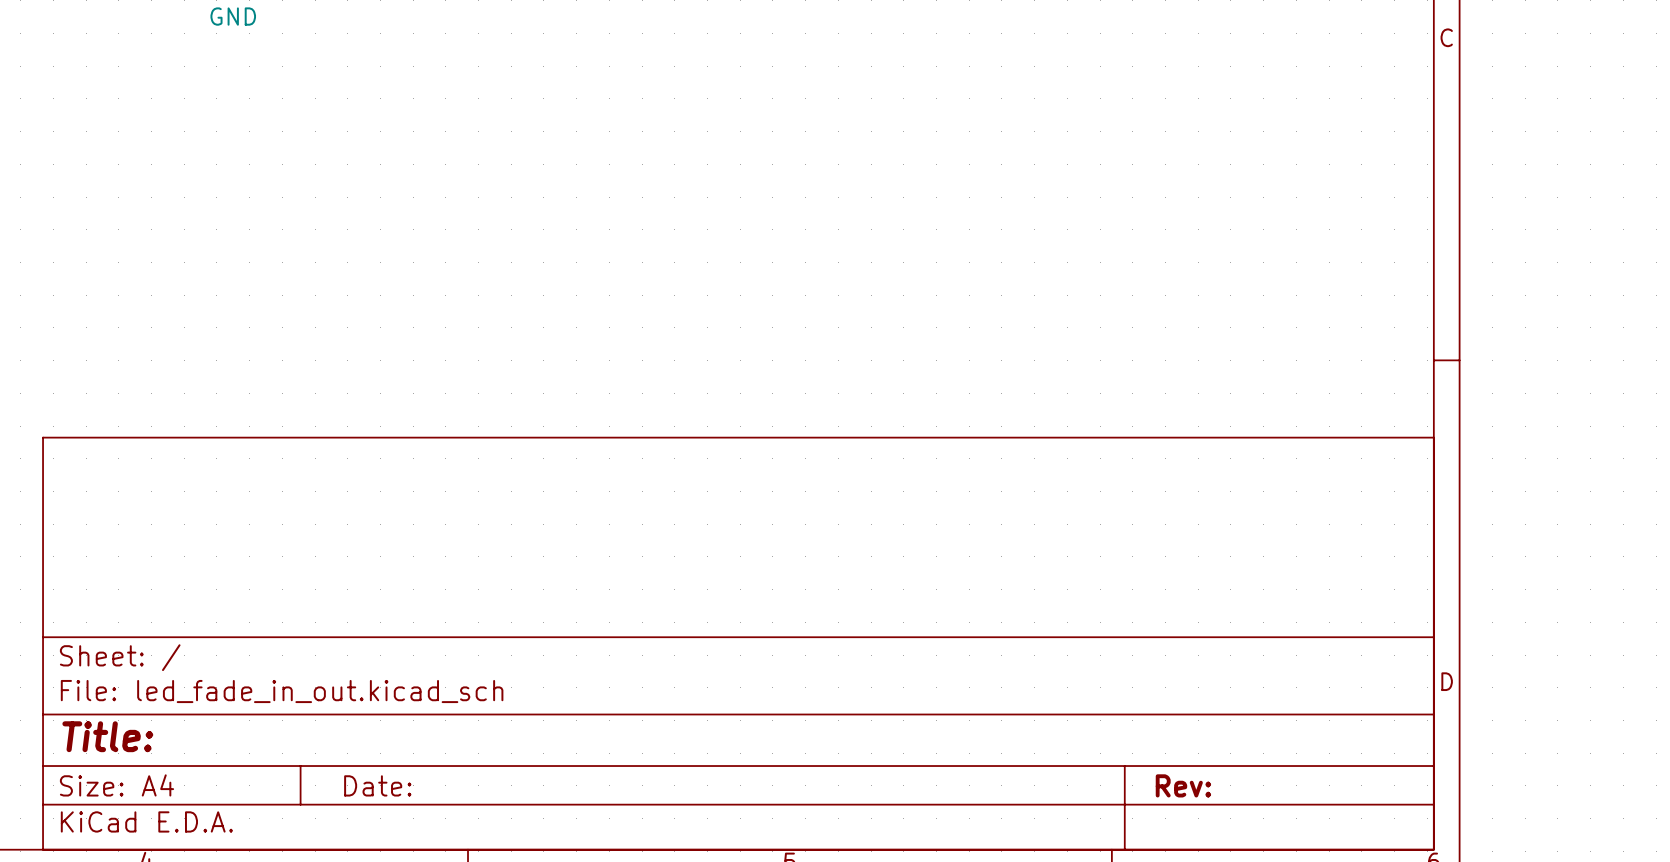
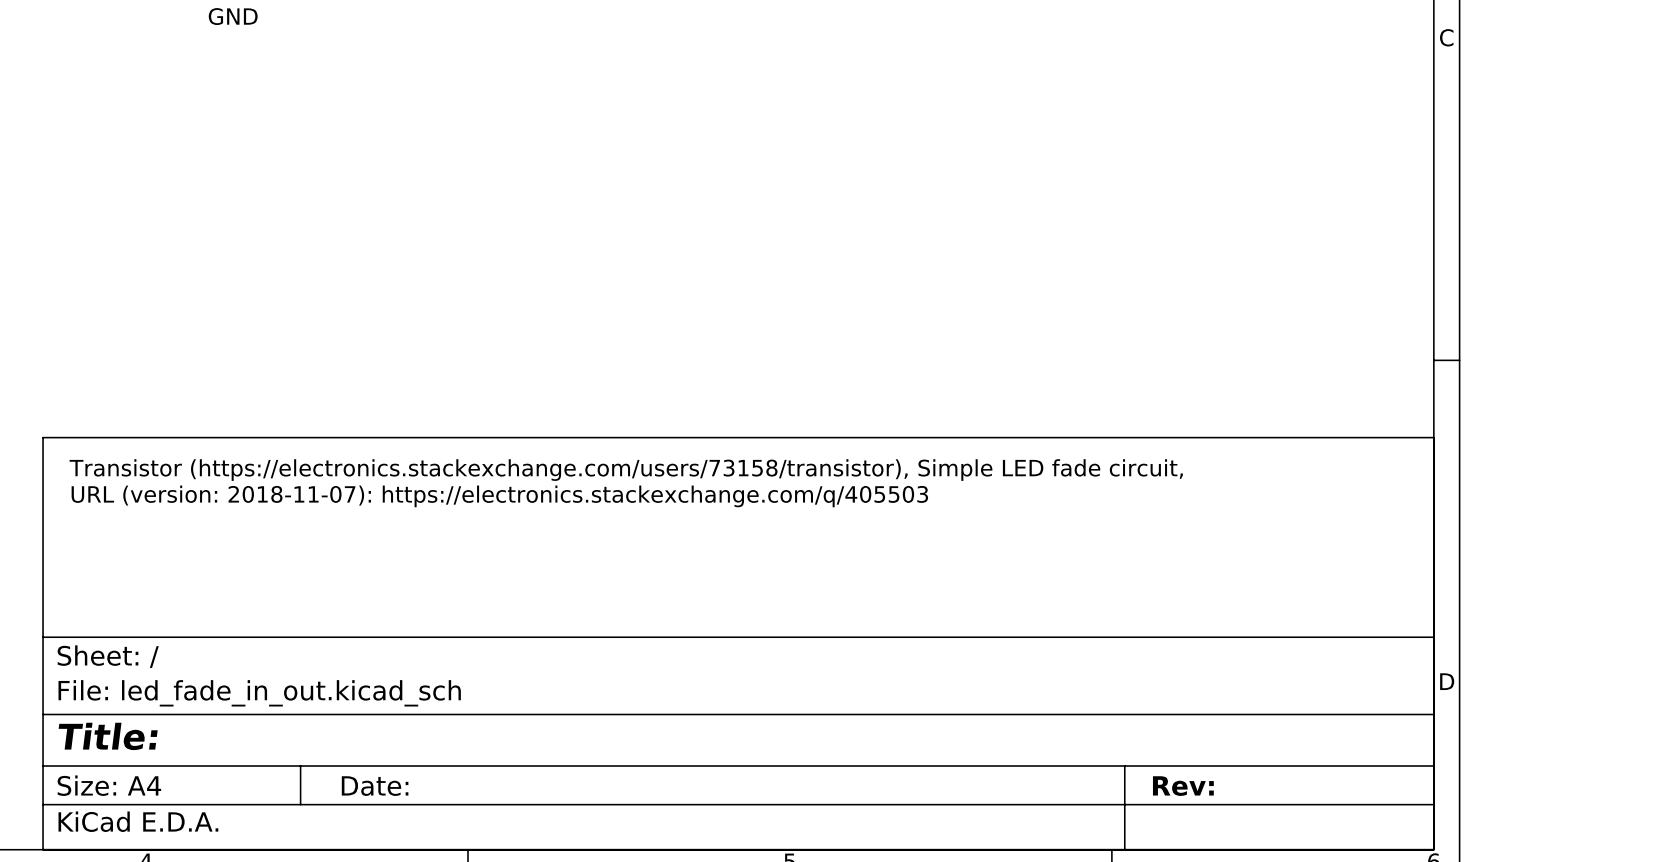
text: none -> Transistor (https://electronics.stackexchange.com/users/73158/transistor), Simple LED fade circuit, (626, 470)
text: none -> URL (version: 2018-11-07): https://electronics.stackexchange.com/q/405503 (499, 496)

